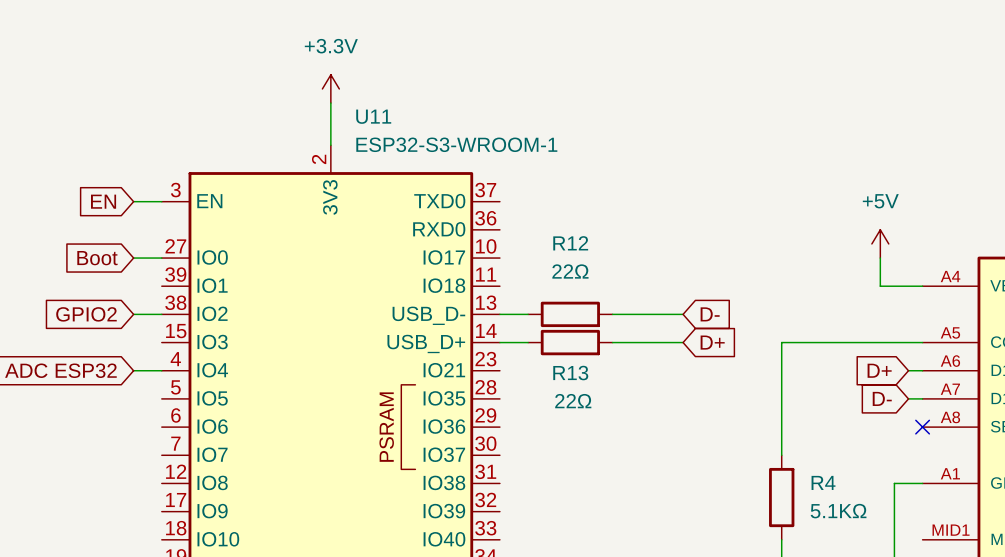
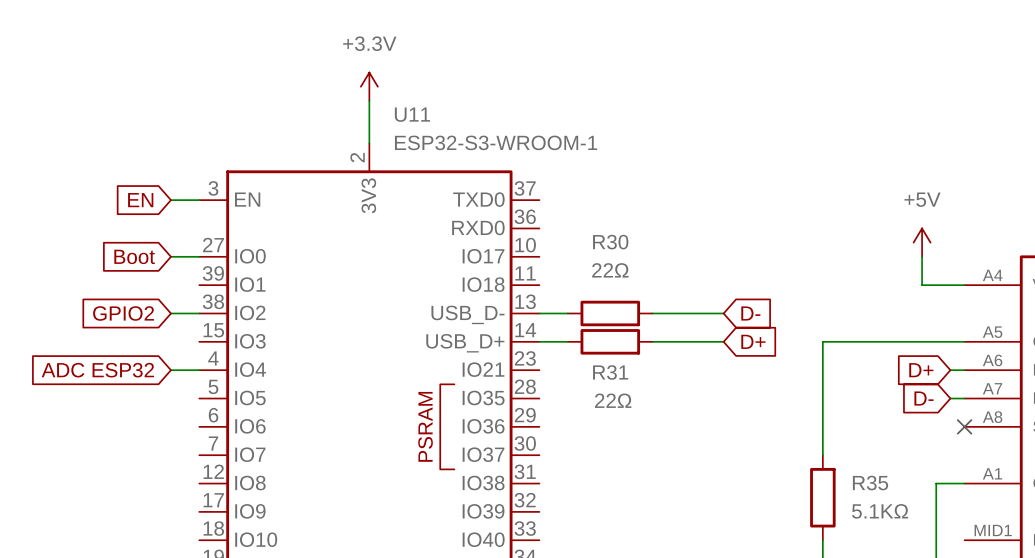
R12 name: R12 (570, 243) -> R30 (610, 242)
R13 name: R13 (570, 373) -> R31 (610, 372)
R4 name: R4 (823, 482) -> R35 (870, 483)

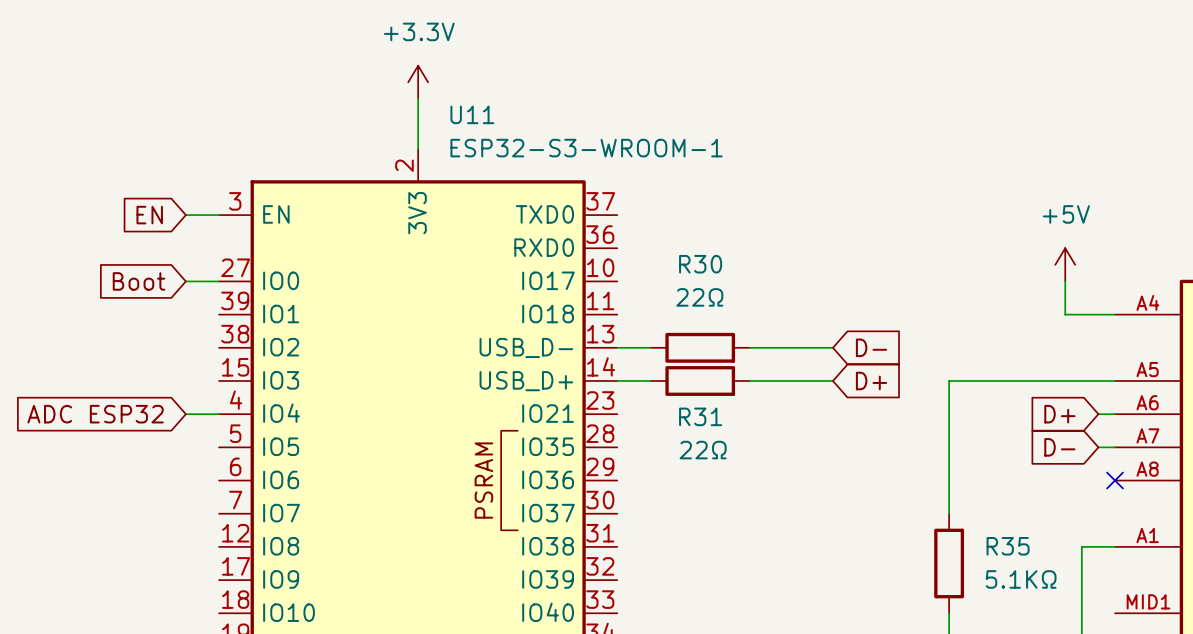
global label: GPIO2 (123, 313) -> none
wire: (170, 313) (199, 313) -> none

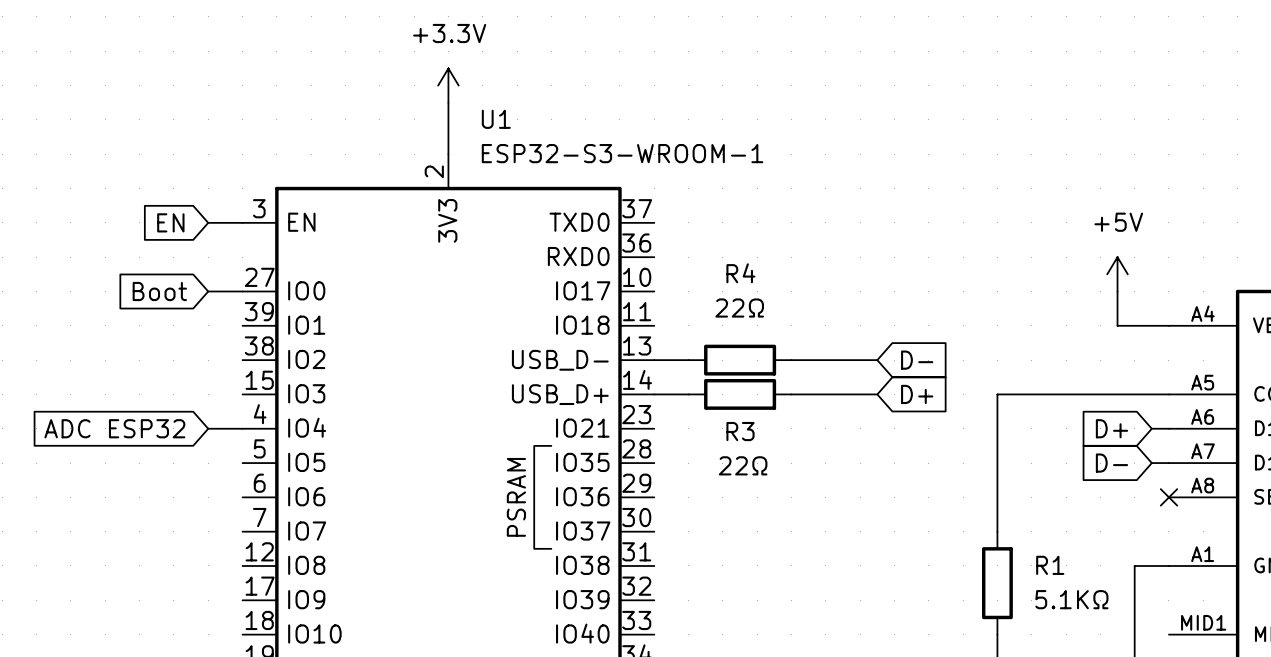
U11 name: U11 (472, 114) -> U1 (496, 119)
R30 name: R30 (700, 264) -> R4 (740, 273)
R31 name: R31 (700, 416) -> R3 (740, 431)
R35 name: R35 (1008, 546) -> R1 (1050, 565)

